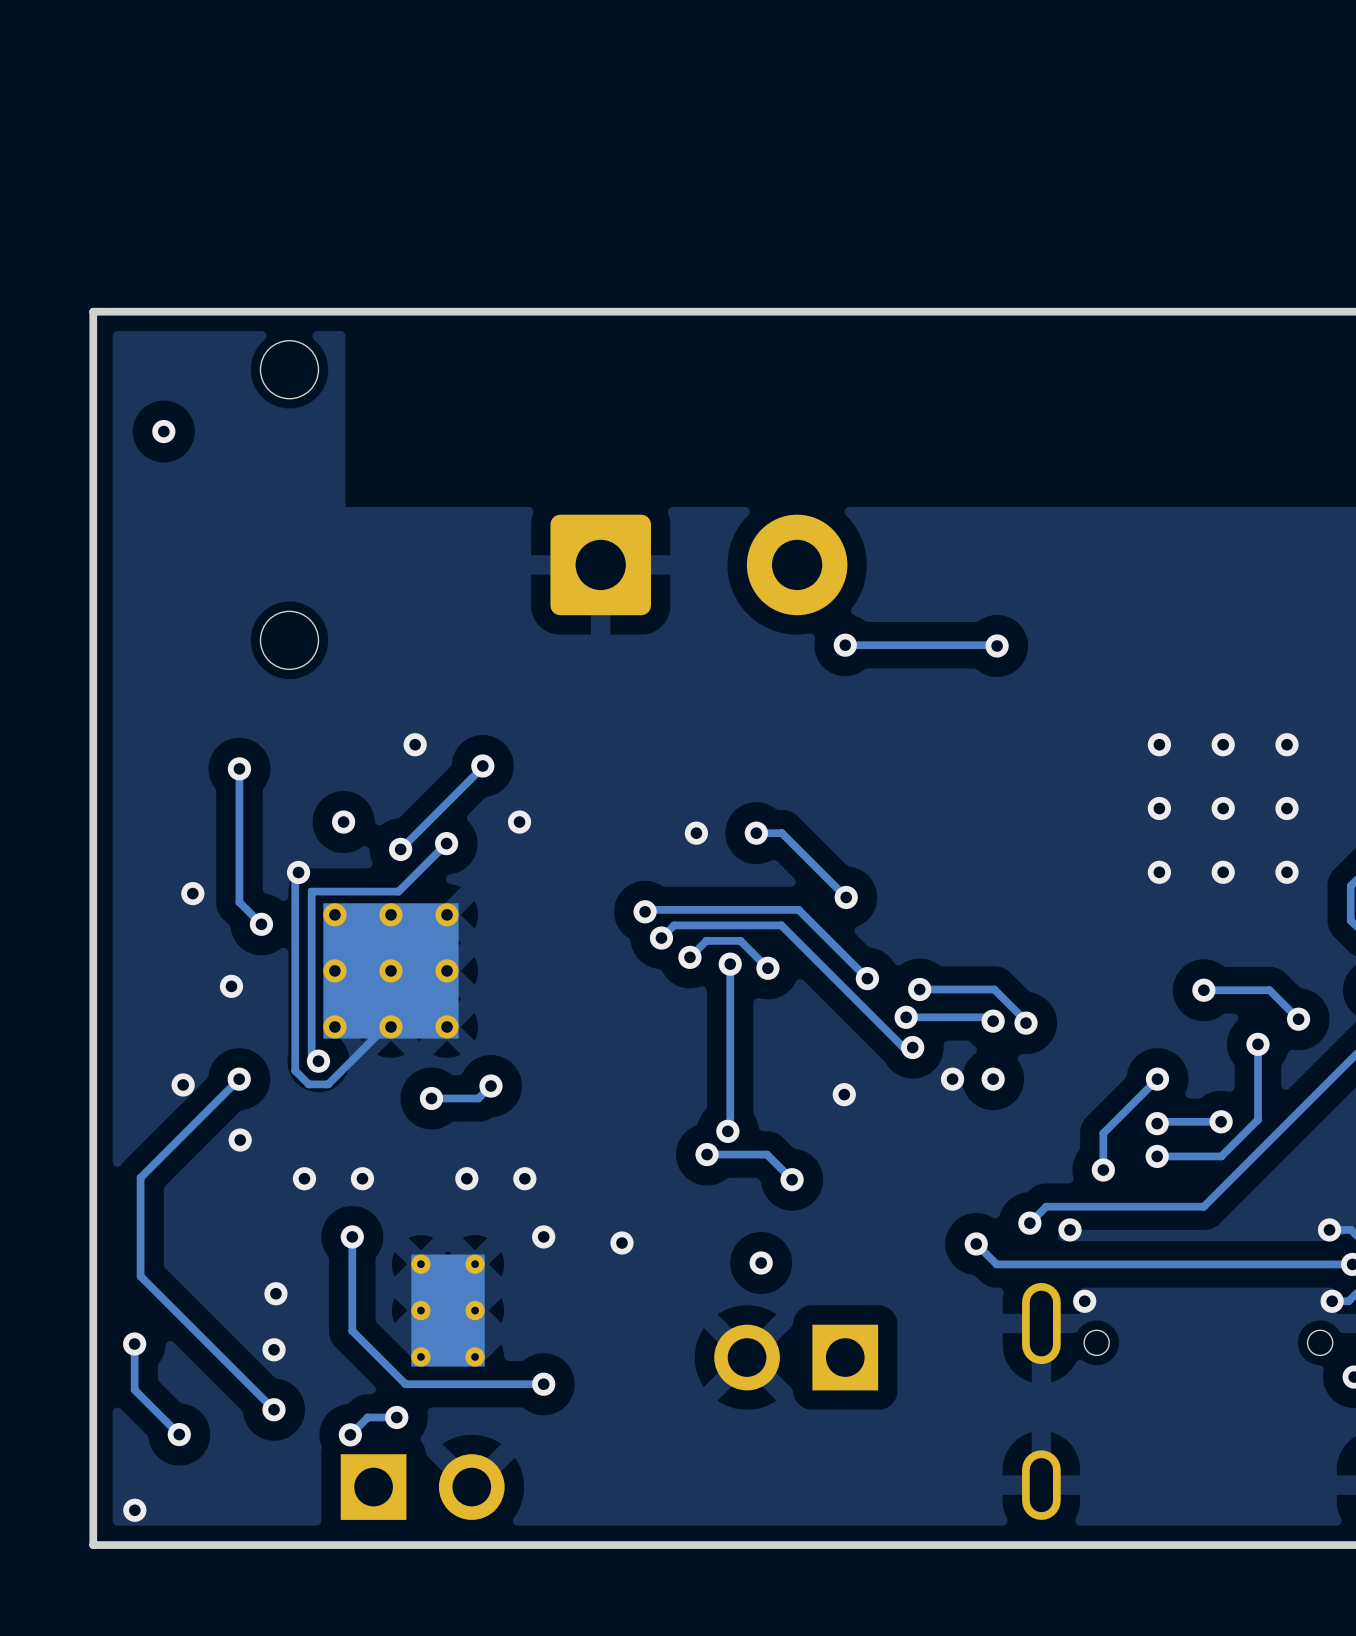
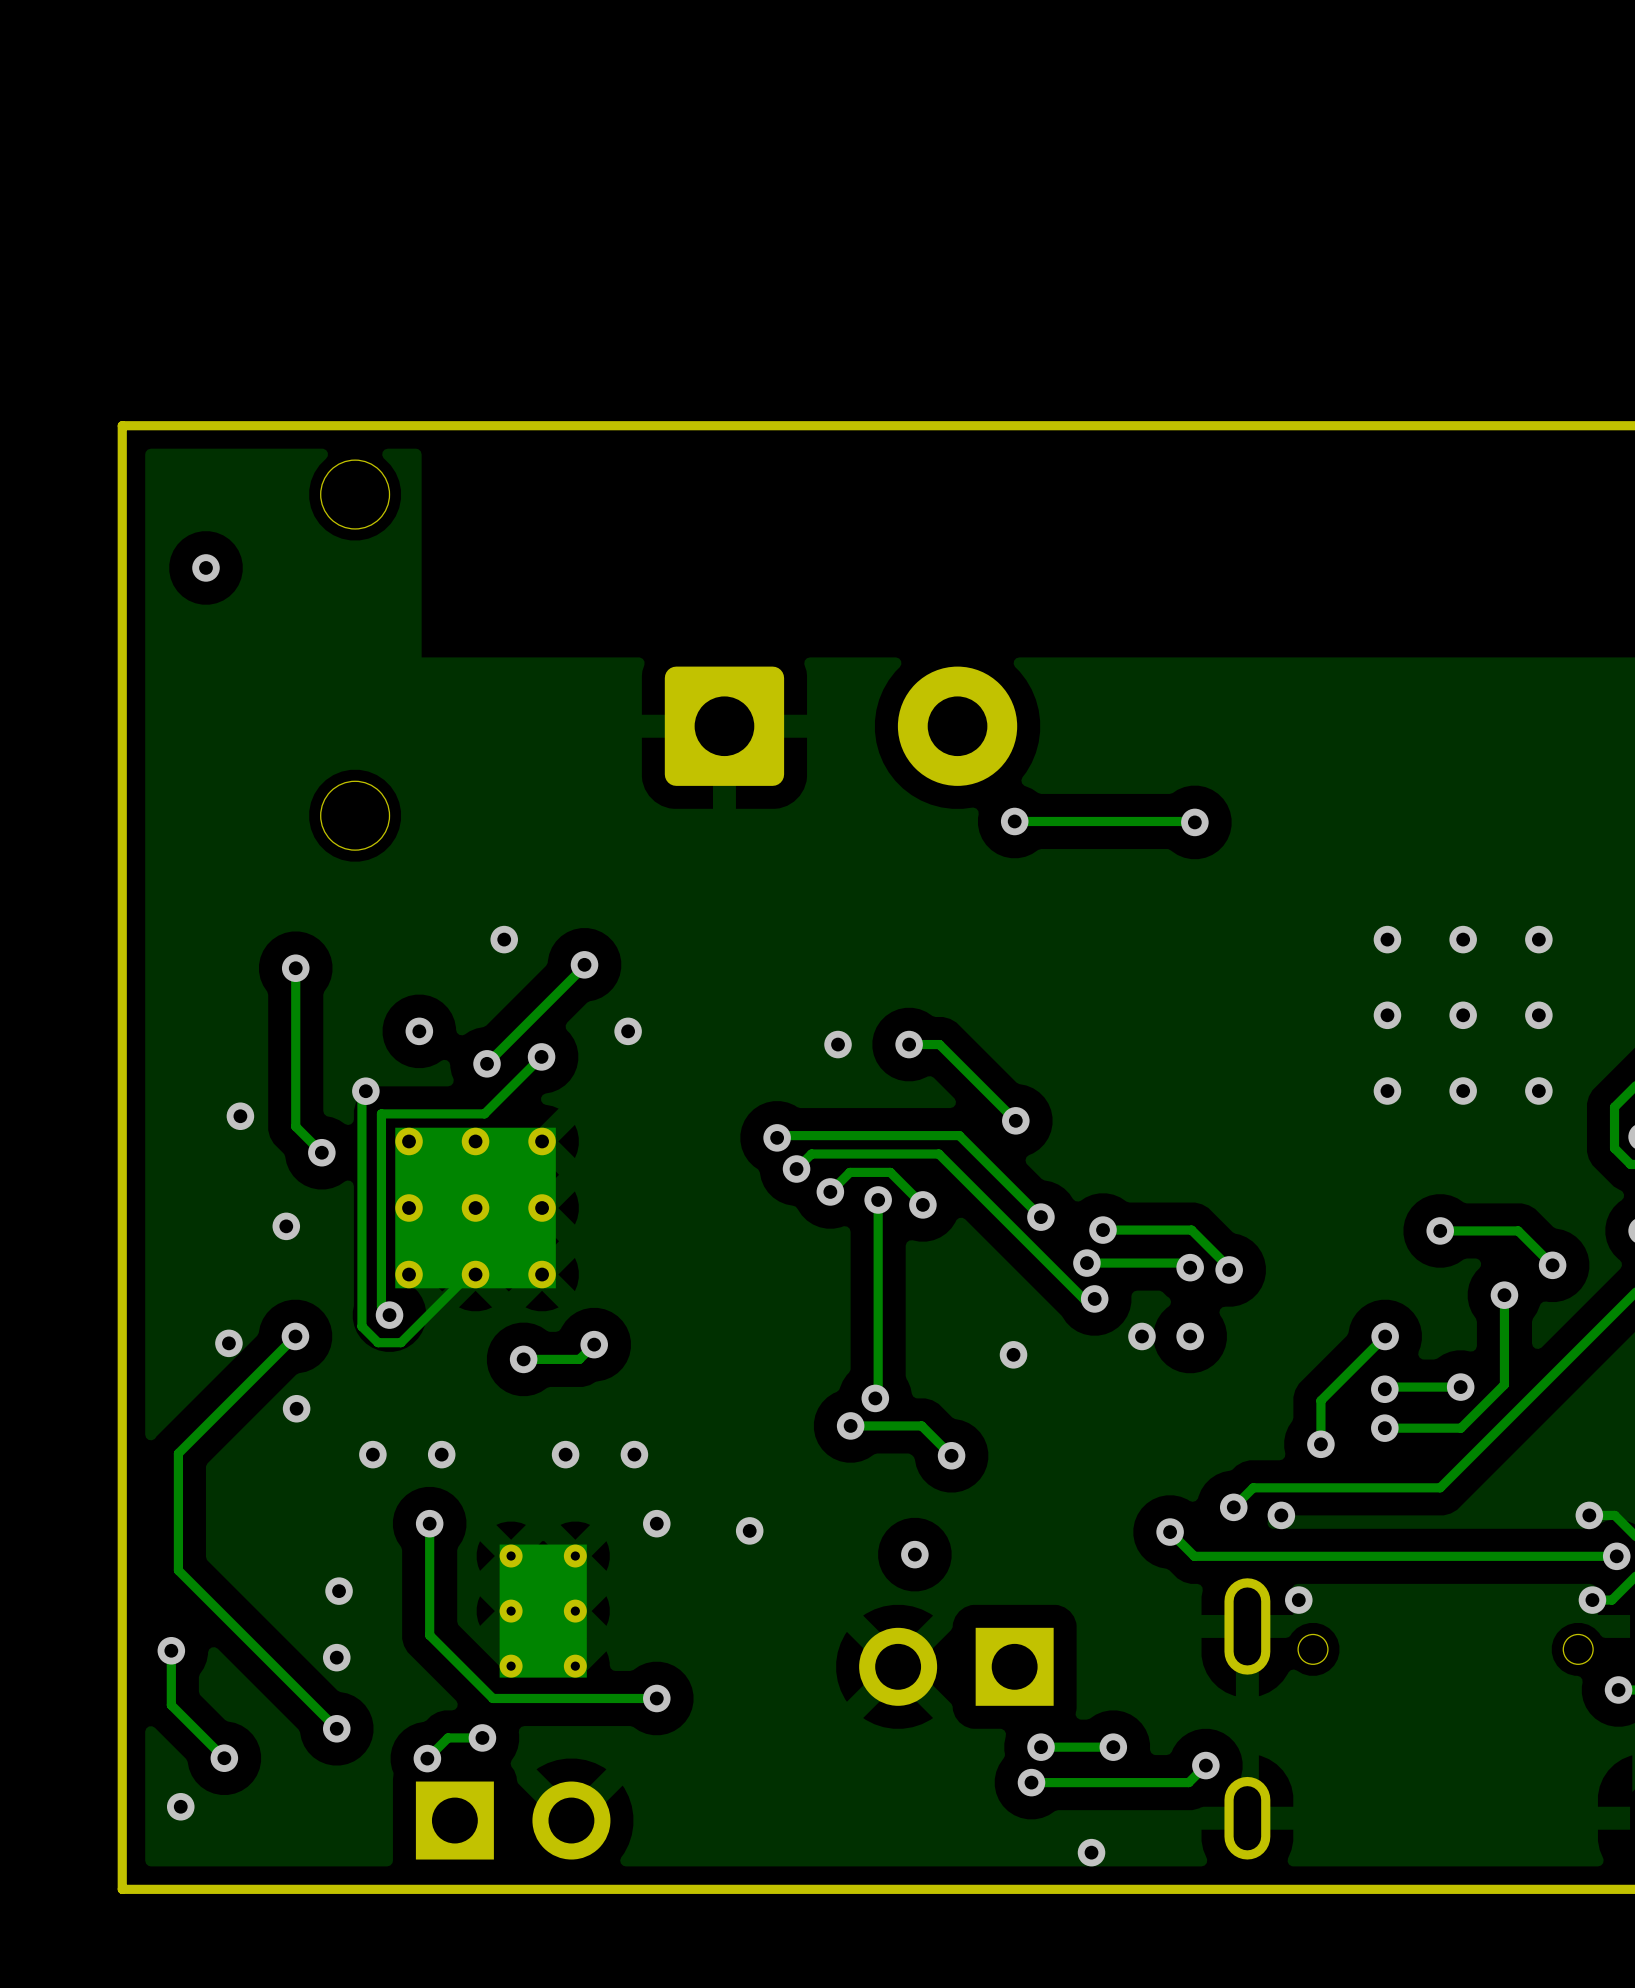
via: none -> (1041, 1747)
track: none -> (1113, 1747) (1041, 1747)
via: none -> (1113, 1747)
track: none -> (1205, 1765) (1188, 1782) (1031, 1782)
via: none -> (1205, 1765)
via: none -> (1031, 1782)
via position: (134, 1510) -> (180, 1806)
via: none -> (1091, 1852)

